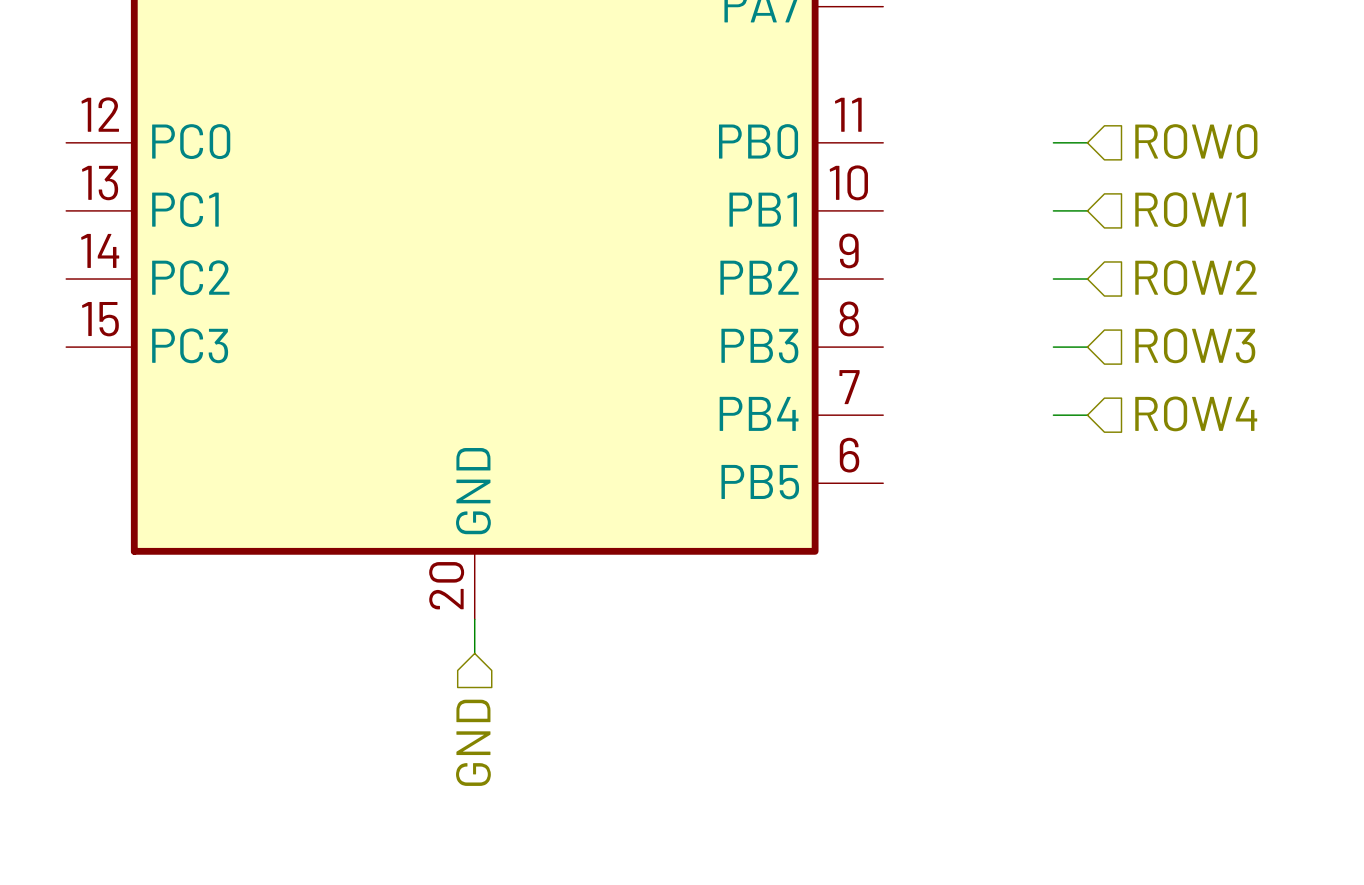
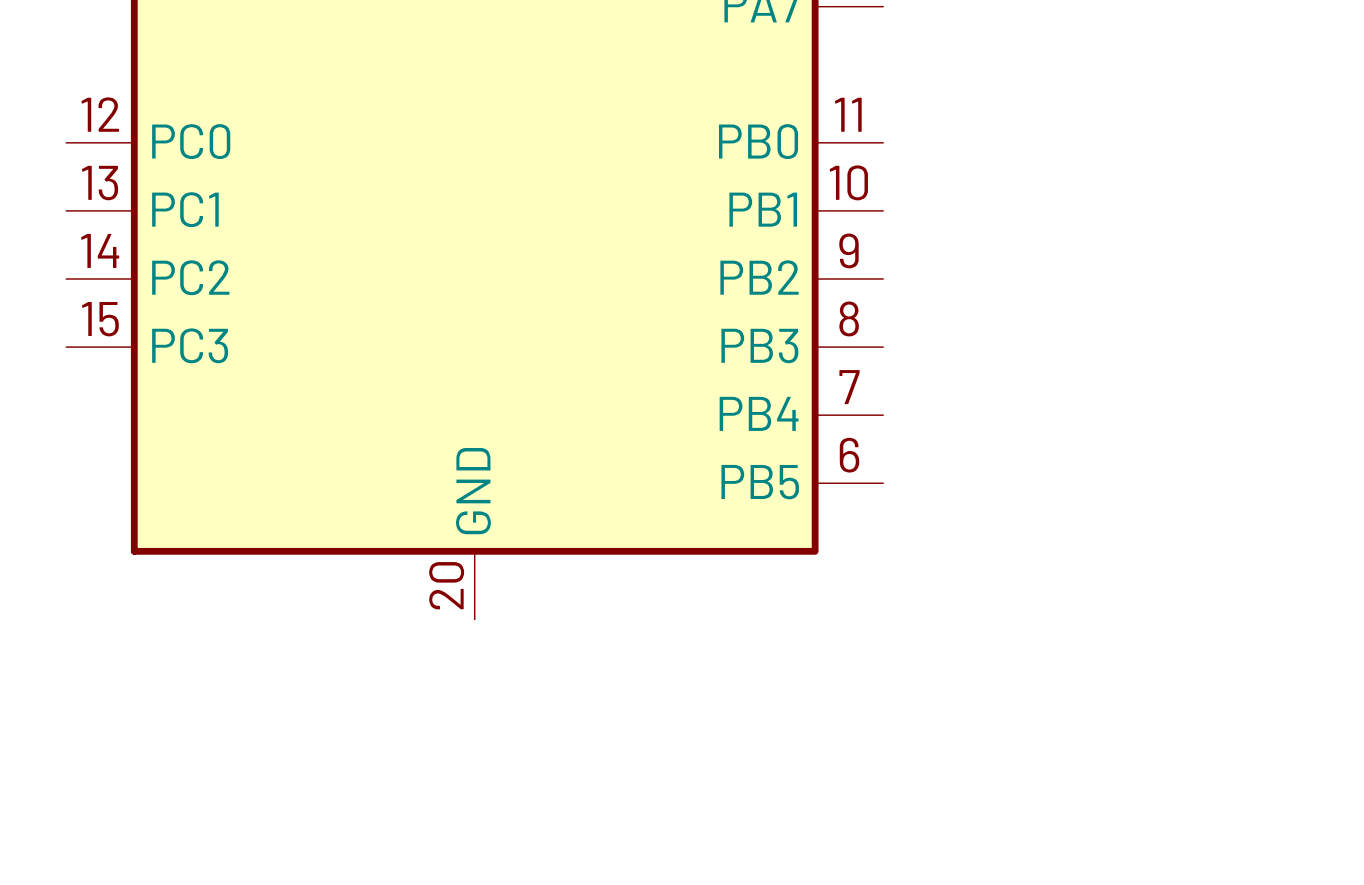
hierarchical label: ROW0 (1196, 141) -> none
wire: (1053, 142) (1087, 142) -> none
hierarchical label: ROW1 (1190, 209) -> none
wire: (1053, 210) (1087, 210) -> none
hierarchical label: ROW2 (1195, 277) -> none
wire: (1053, 279) (1087, 279) -> none
hierarchical label: ROW3 (1195, 345) -> none
wire: (1053, 347) (1087, 347) -> none
hierarchical label: ROW4 (1196, 413) -> none
wire: (1053, 415) (1087, 415) -> none
wire: (474, 619) (474, 653) -> none
hierarchical label: GND (473, 742) -> none

